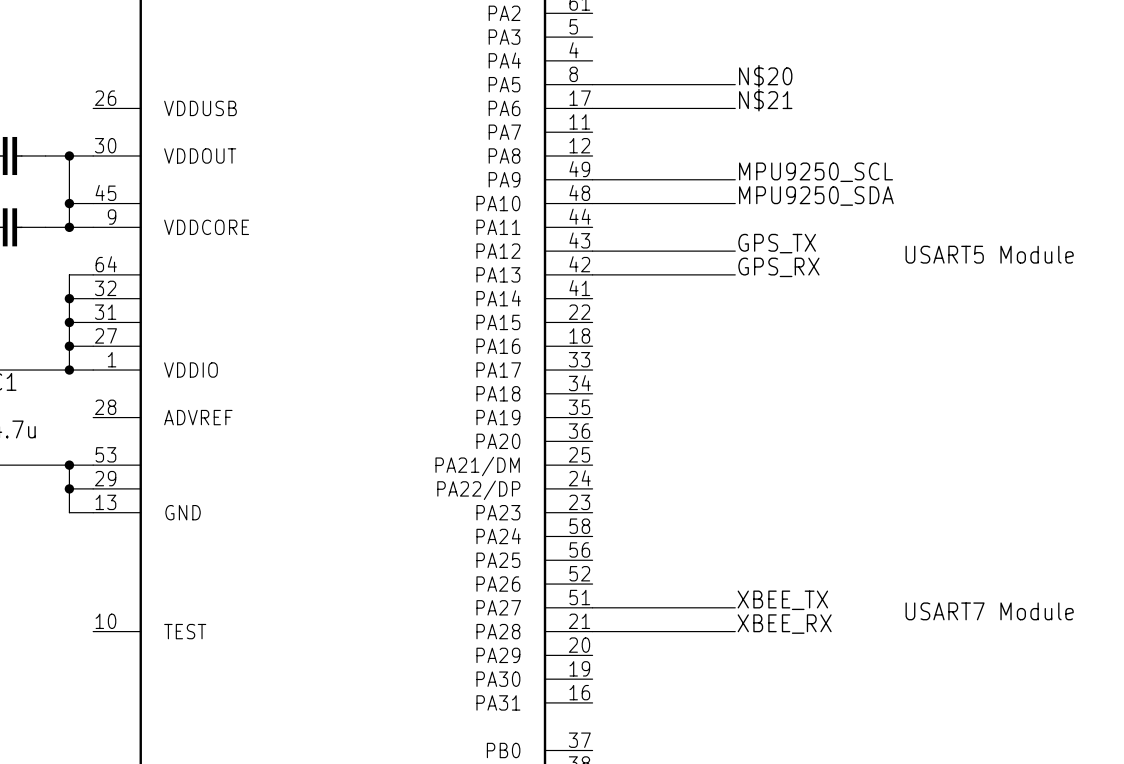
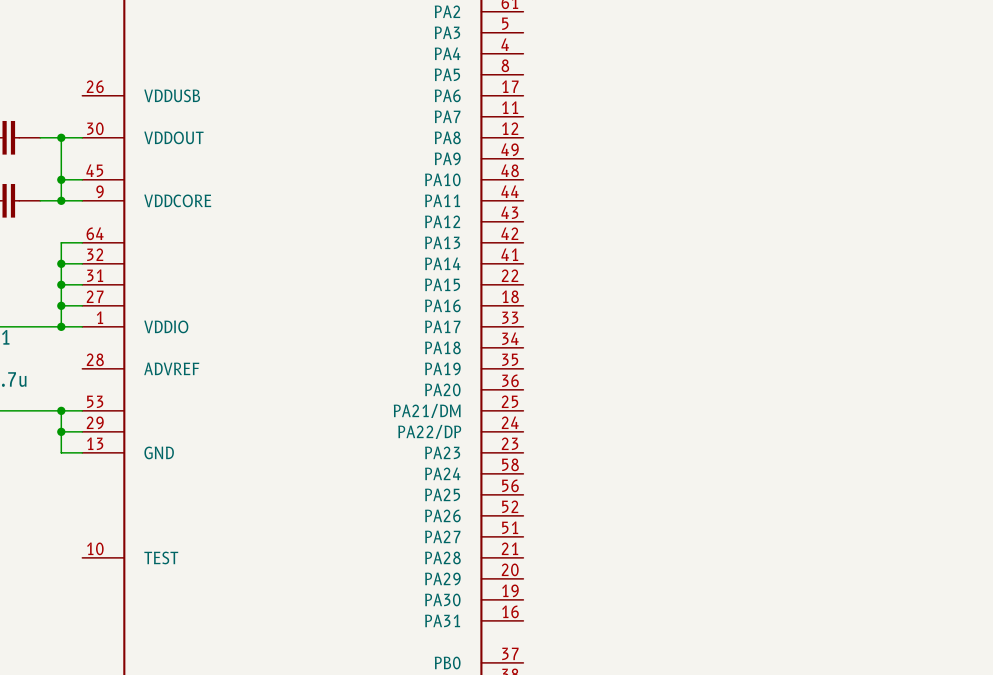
label: N$20 (765, 76) -> none
wire: (592, 84) (735, 84) -> none
label: N$21 (765, 100) -> none
wire: (592, 108) (735, 108) -> none
label: MPU9250_SCL (816, 172) -> none
wire: (592, 179) (735, 179) -> none
label: MPU9250_SDA (816, 196) -> none
wire: (592, 203) (735, 203) -> none
label: GPS_TX (777, 243) -> none
wire: (592, 251) (735, 251) -> none
text: USART5 Module (989, 254) -> none
label: GPS_RX (778, 267) -> none
wire: (592, 274) (735, 274) -> none
label: XBEE_TX (782, 600) -> none
wire: (592, 607) (735, 607) -> none
text: USART7 Module (989, 611) -> none
label: XBEE_RX (784, 624) -> none
wire: (592, 631) (735, 631) -> none

